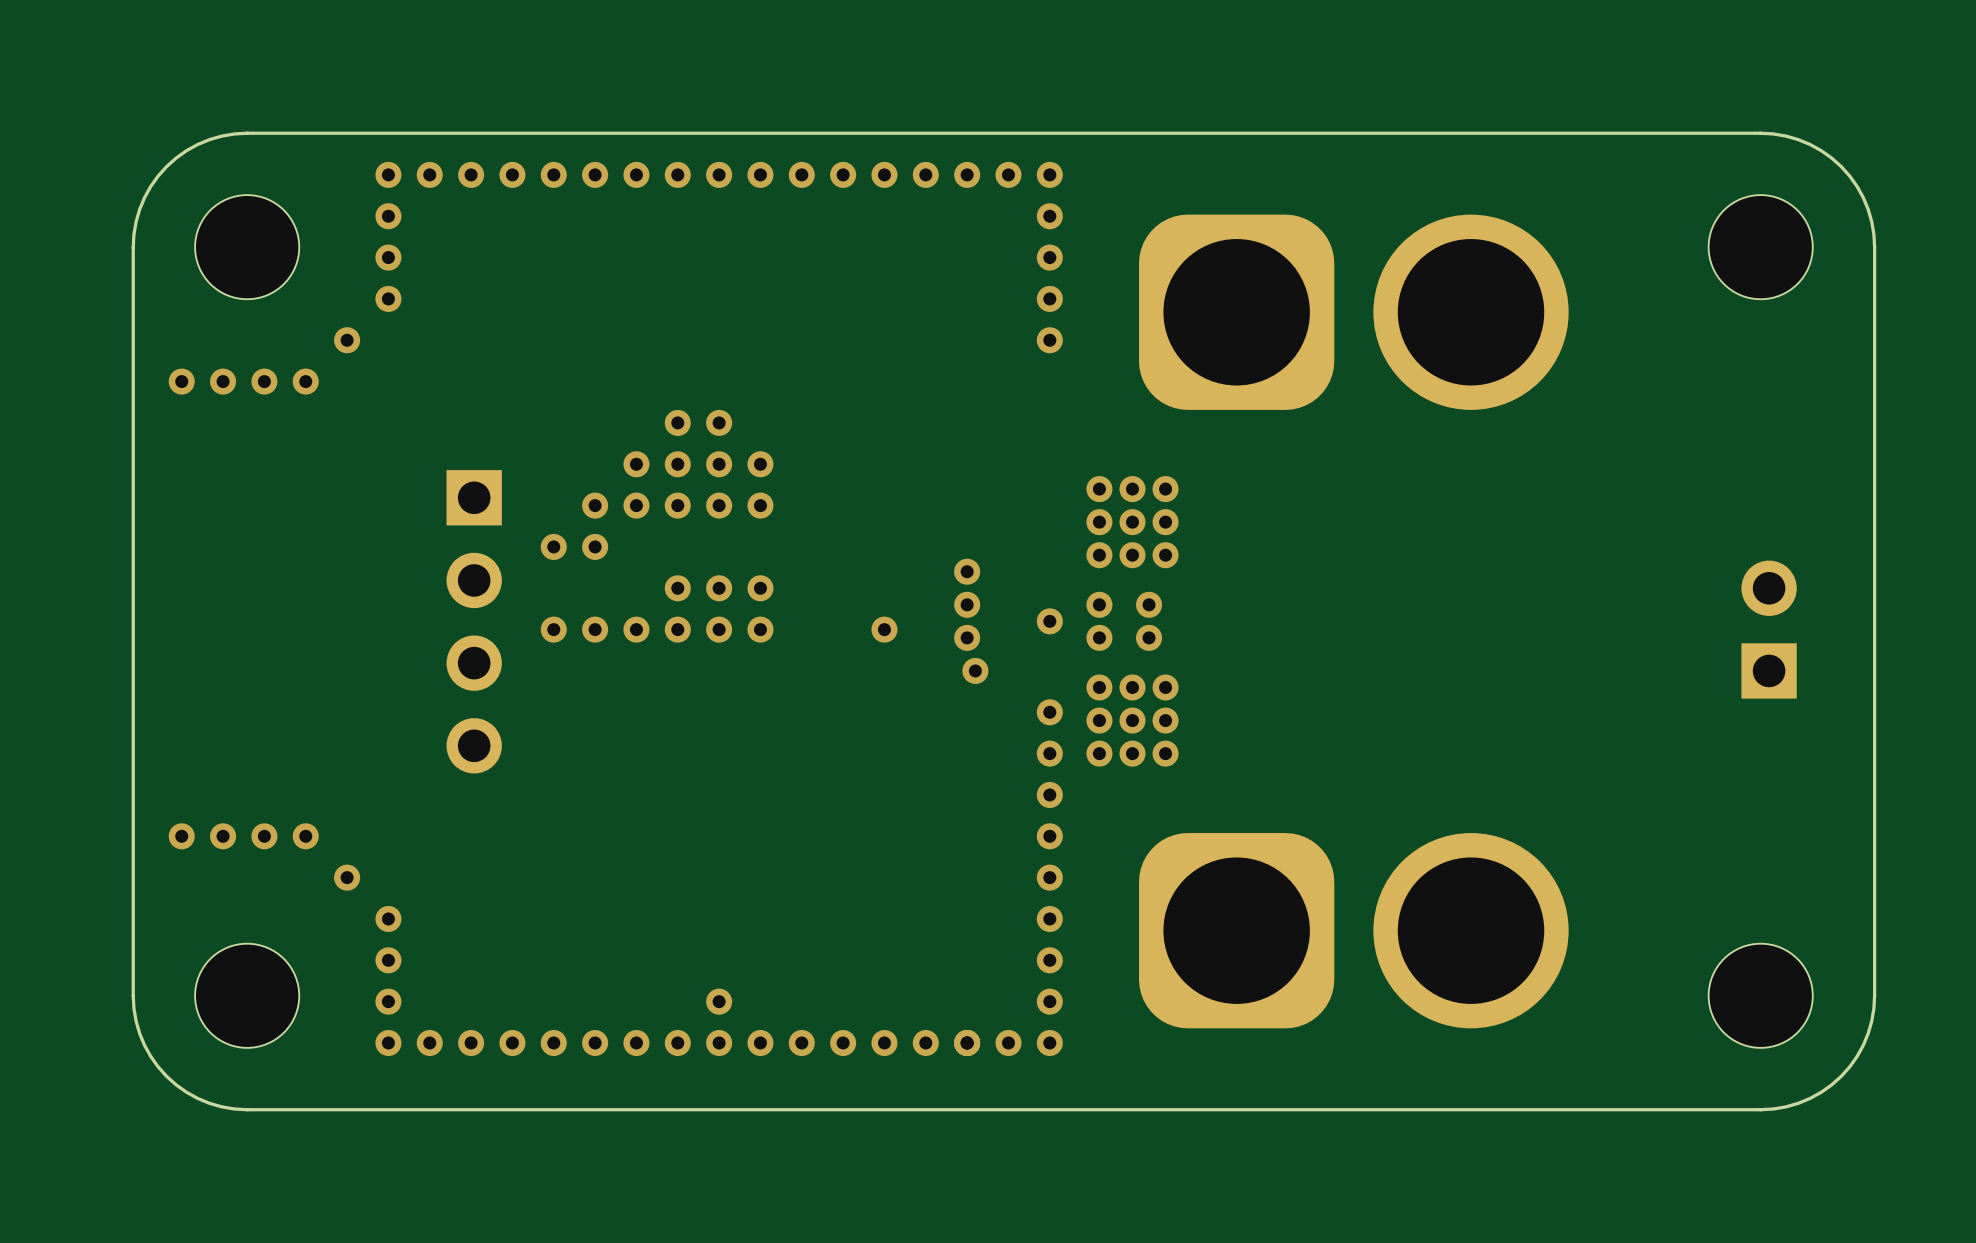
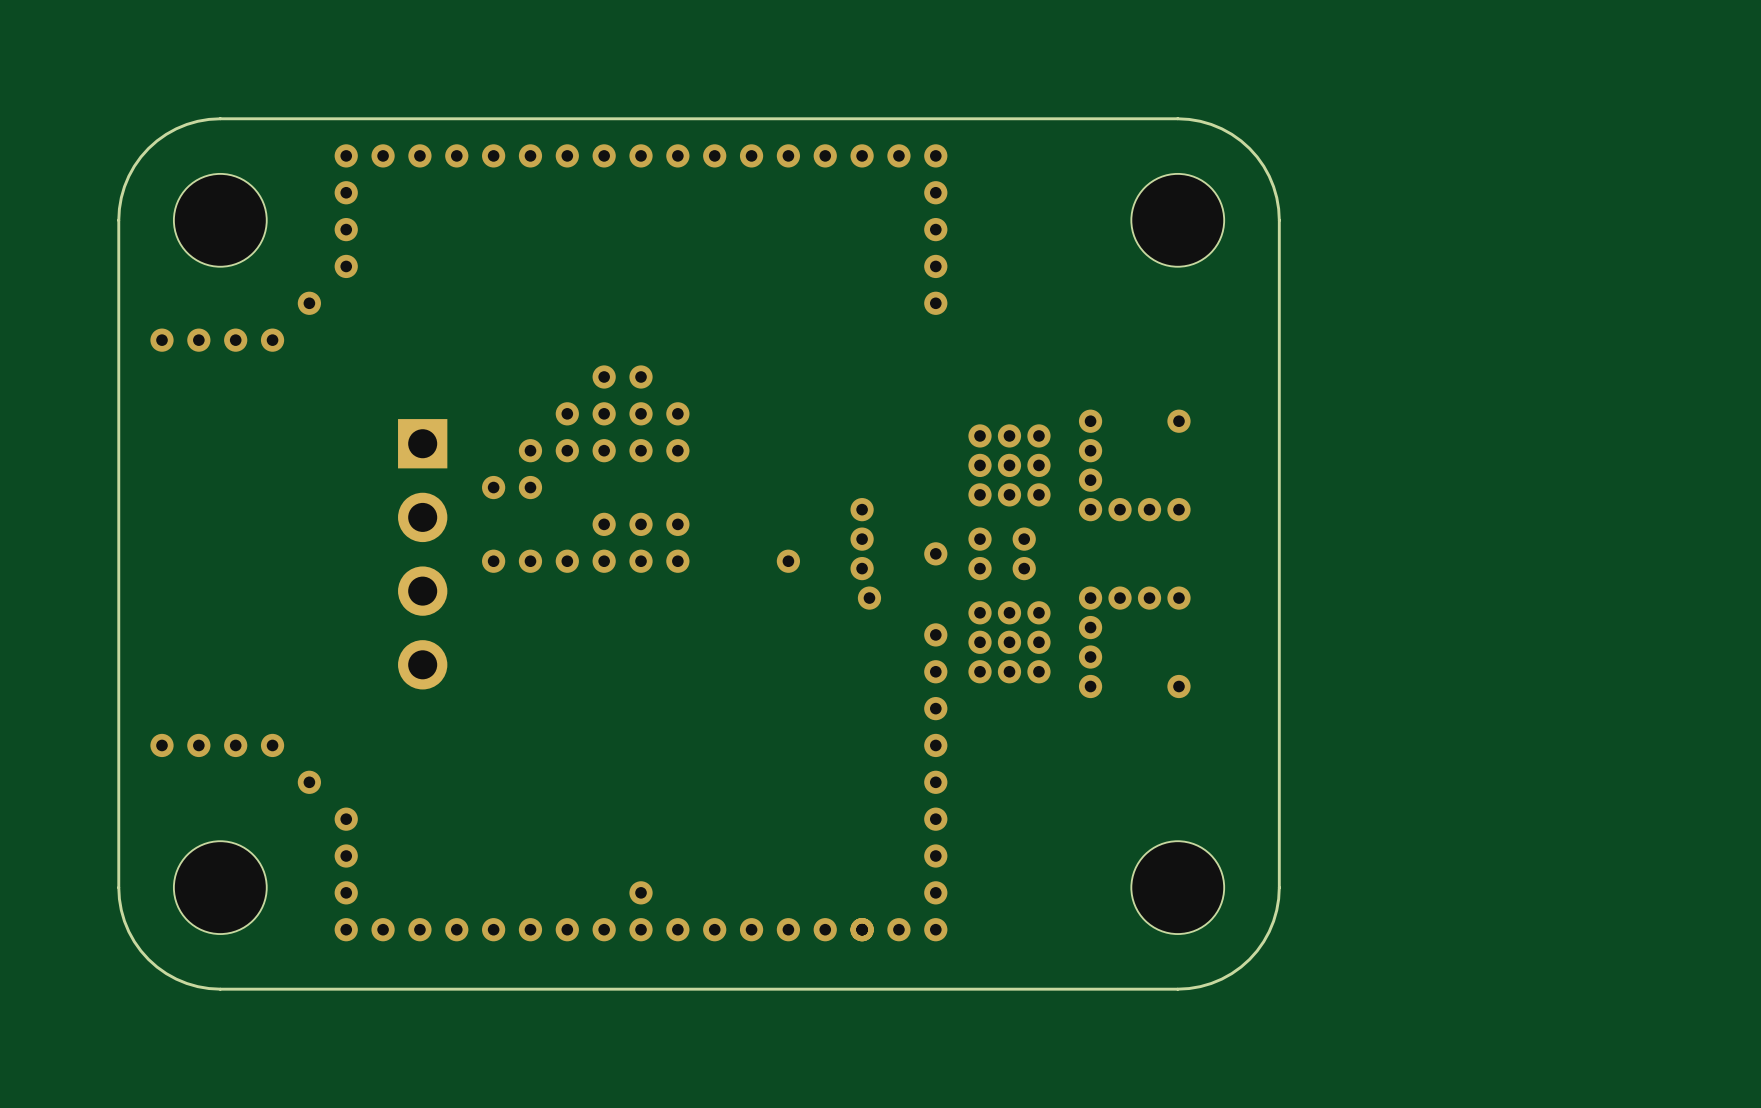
board edge: (1321, 133) (1760, 133) (1786, 136) (1821, 150) (1849, 176) (1868, 209) (1874, 247) (1874, 995) (1868, 1033) (1857, 1056) (1841, 1076) (1821, 1092) (1798, 1103) (1773, 1109) (1321, 1109) -> (1177, 118) (1200, 121) (1221, 128) (1249, 148) (1263, 166) (1273, 186) (1279, 220) (1278, 899) (1269, 931) (1257, 950) (1241, 967) (1211, 983) (1177, 989)
part: none -> (1177, 220)
part: (1760, 247) -> none
part: (1353, 312) -> none
via: none -> (1090, 421)
via: none -> (1178, 421)
via: none -> (1090, 450)
via: none -> (1090, 480)
via: none -> (1090, 509)
via: none -> (1120, 509)
via: none -> (1149, 509)
via: none -> (1178, 509)
part: (1769, 629) -> none
via: none -> (1090, 598)
via: none -> (1120, 598)
via: none -> (1149, 598)
via: none -> (1178, 598)
via: none -> (1090, 627)
via: none -> (1090, 657)
via: none -> (1090, 686)
via: none -> (1178, 686)
part: (1353, 930) -> none
part: none -> (1177, 887)
part: (1760, 995) -> none

